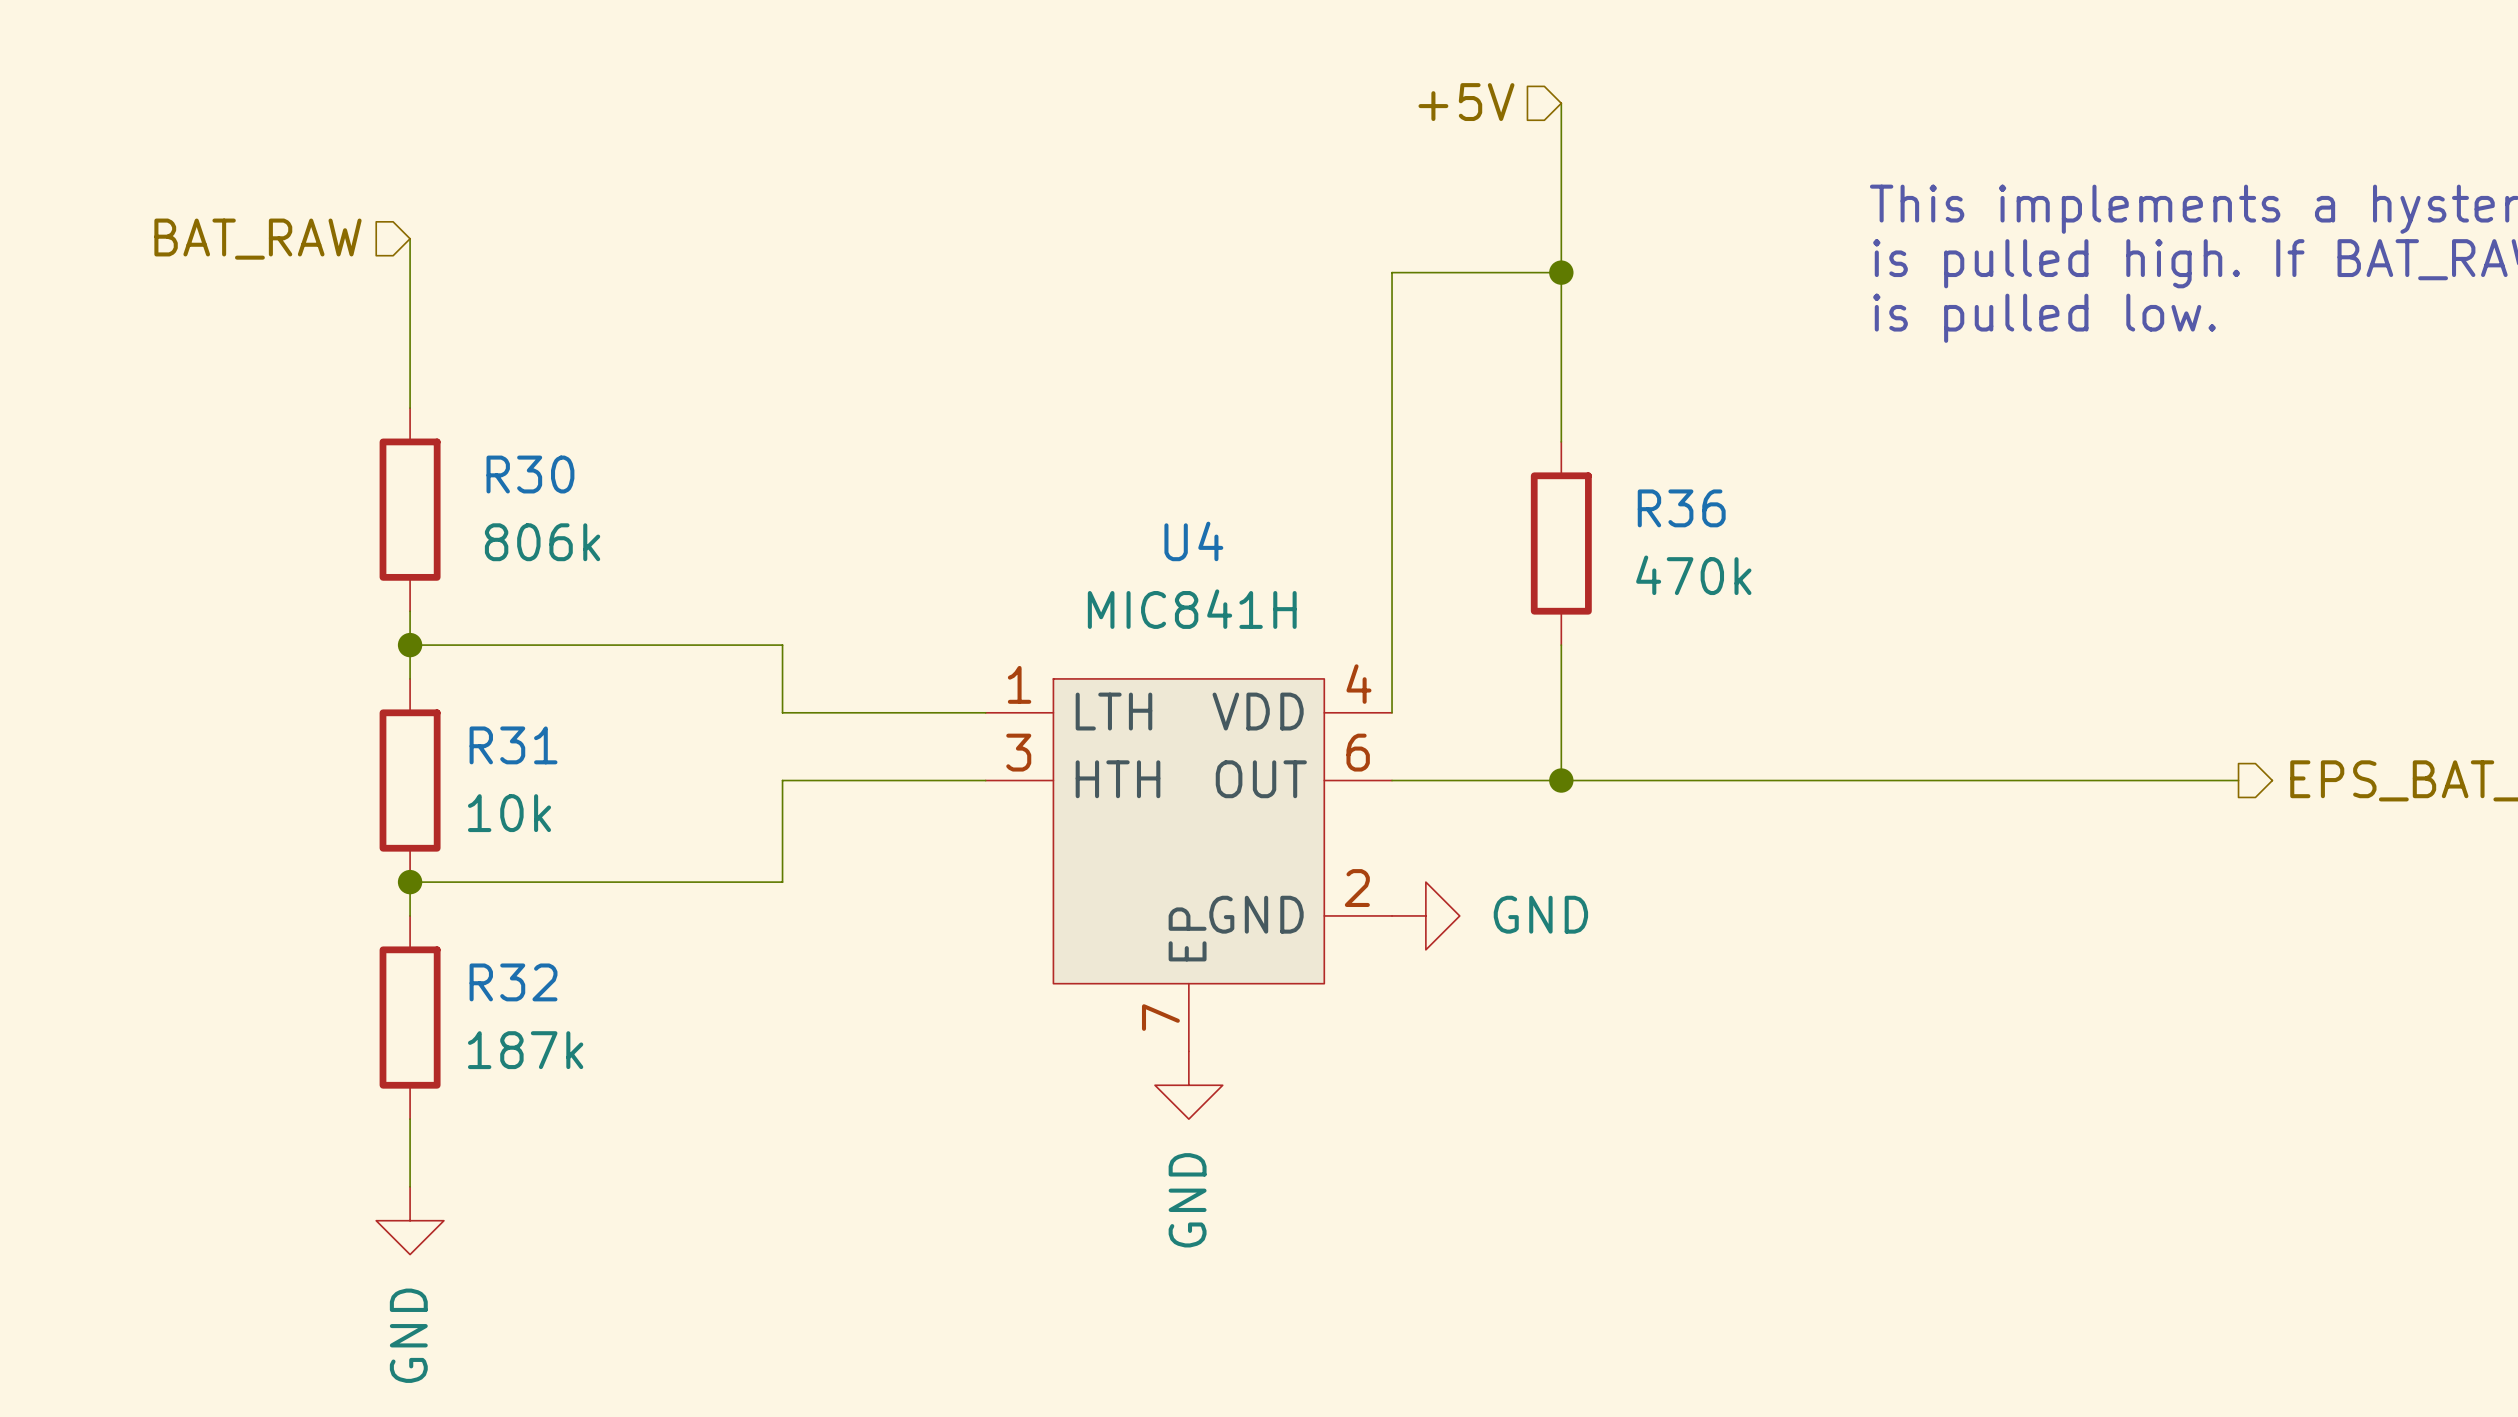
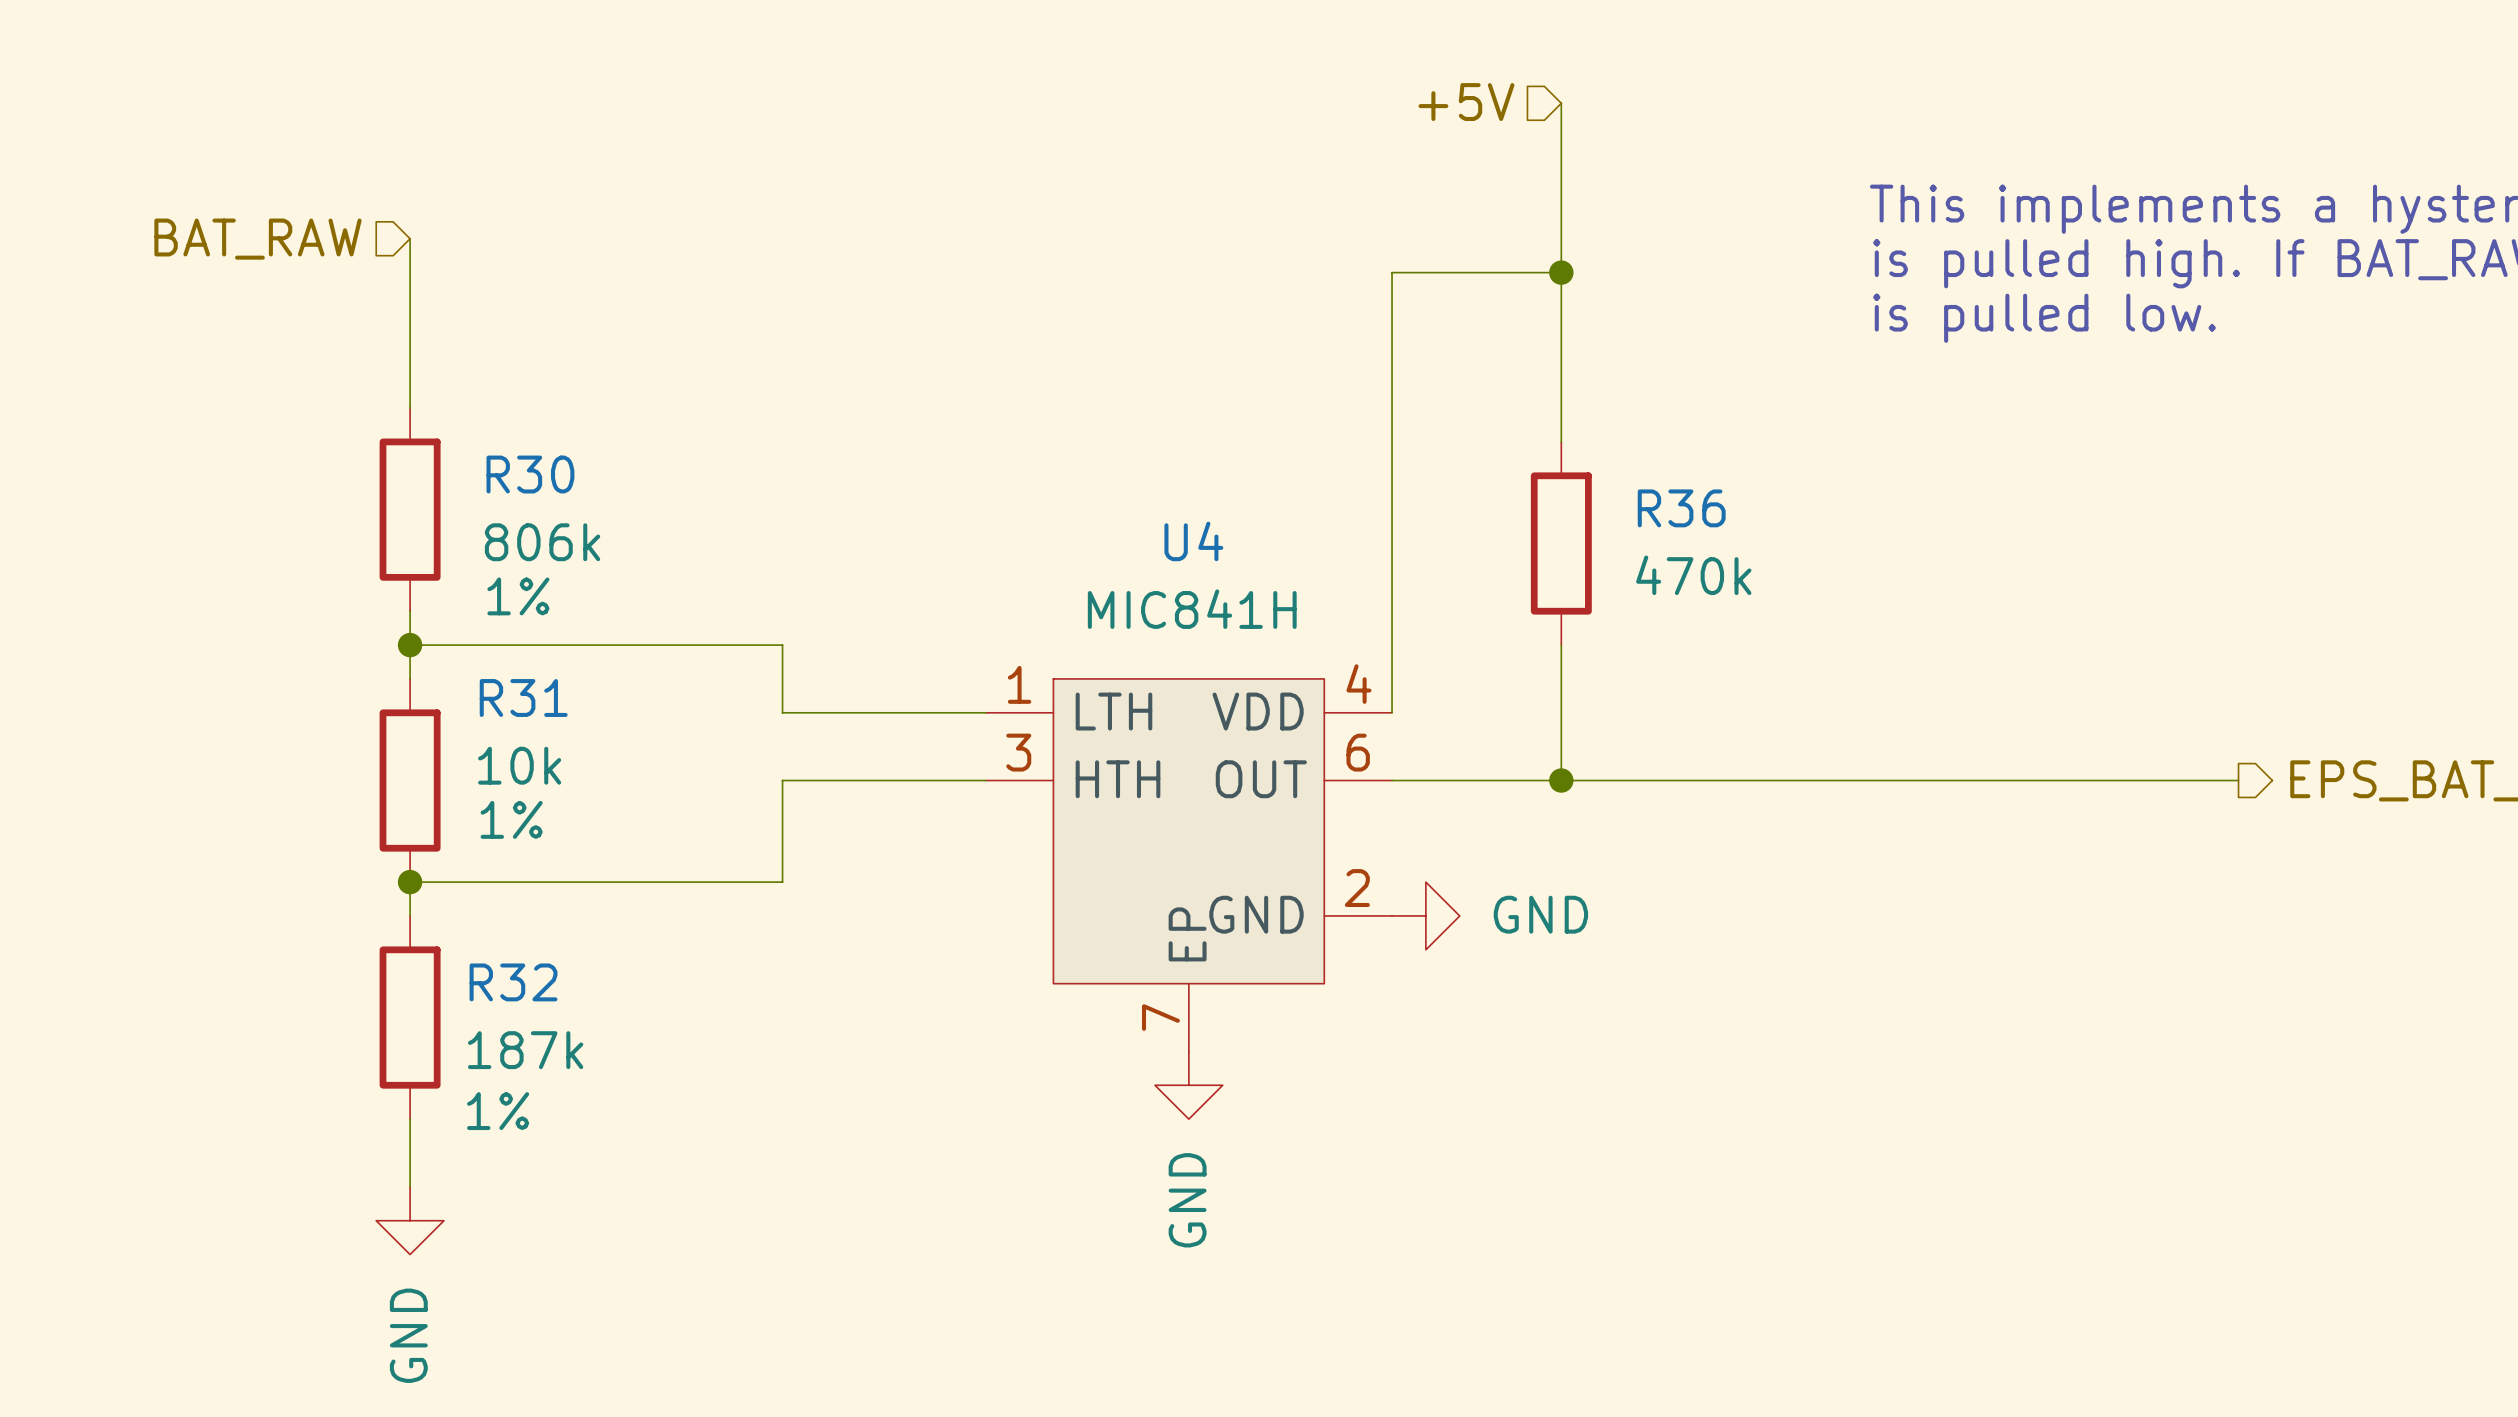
R30 text: none -> 1% (518, 596)
R31 name position: R31 (513, 745) -> R31 (523, 698)
R31 value position: 10k (509, 813) -> 10k (519, 765)
R31 text: none -> 1% (511, 819)
R32 text: none -> 1% (498, 1111)

